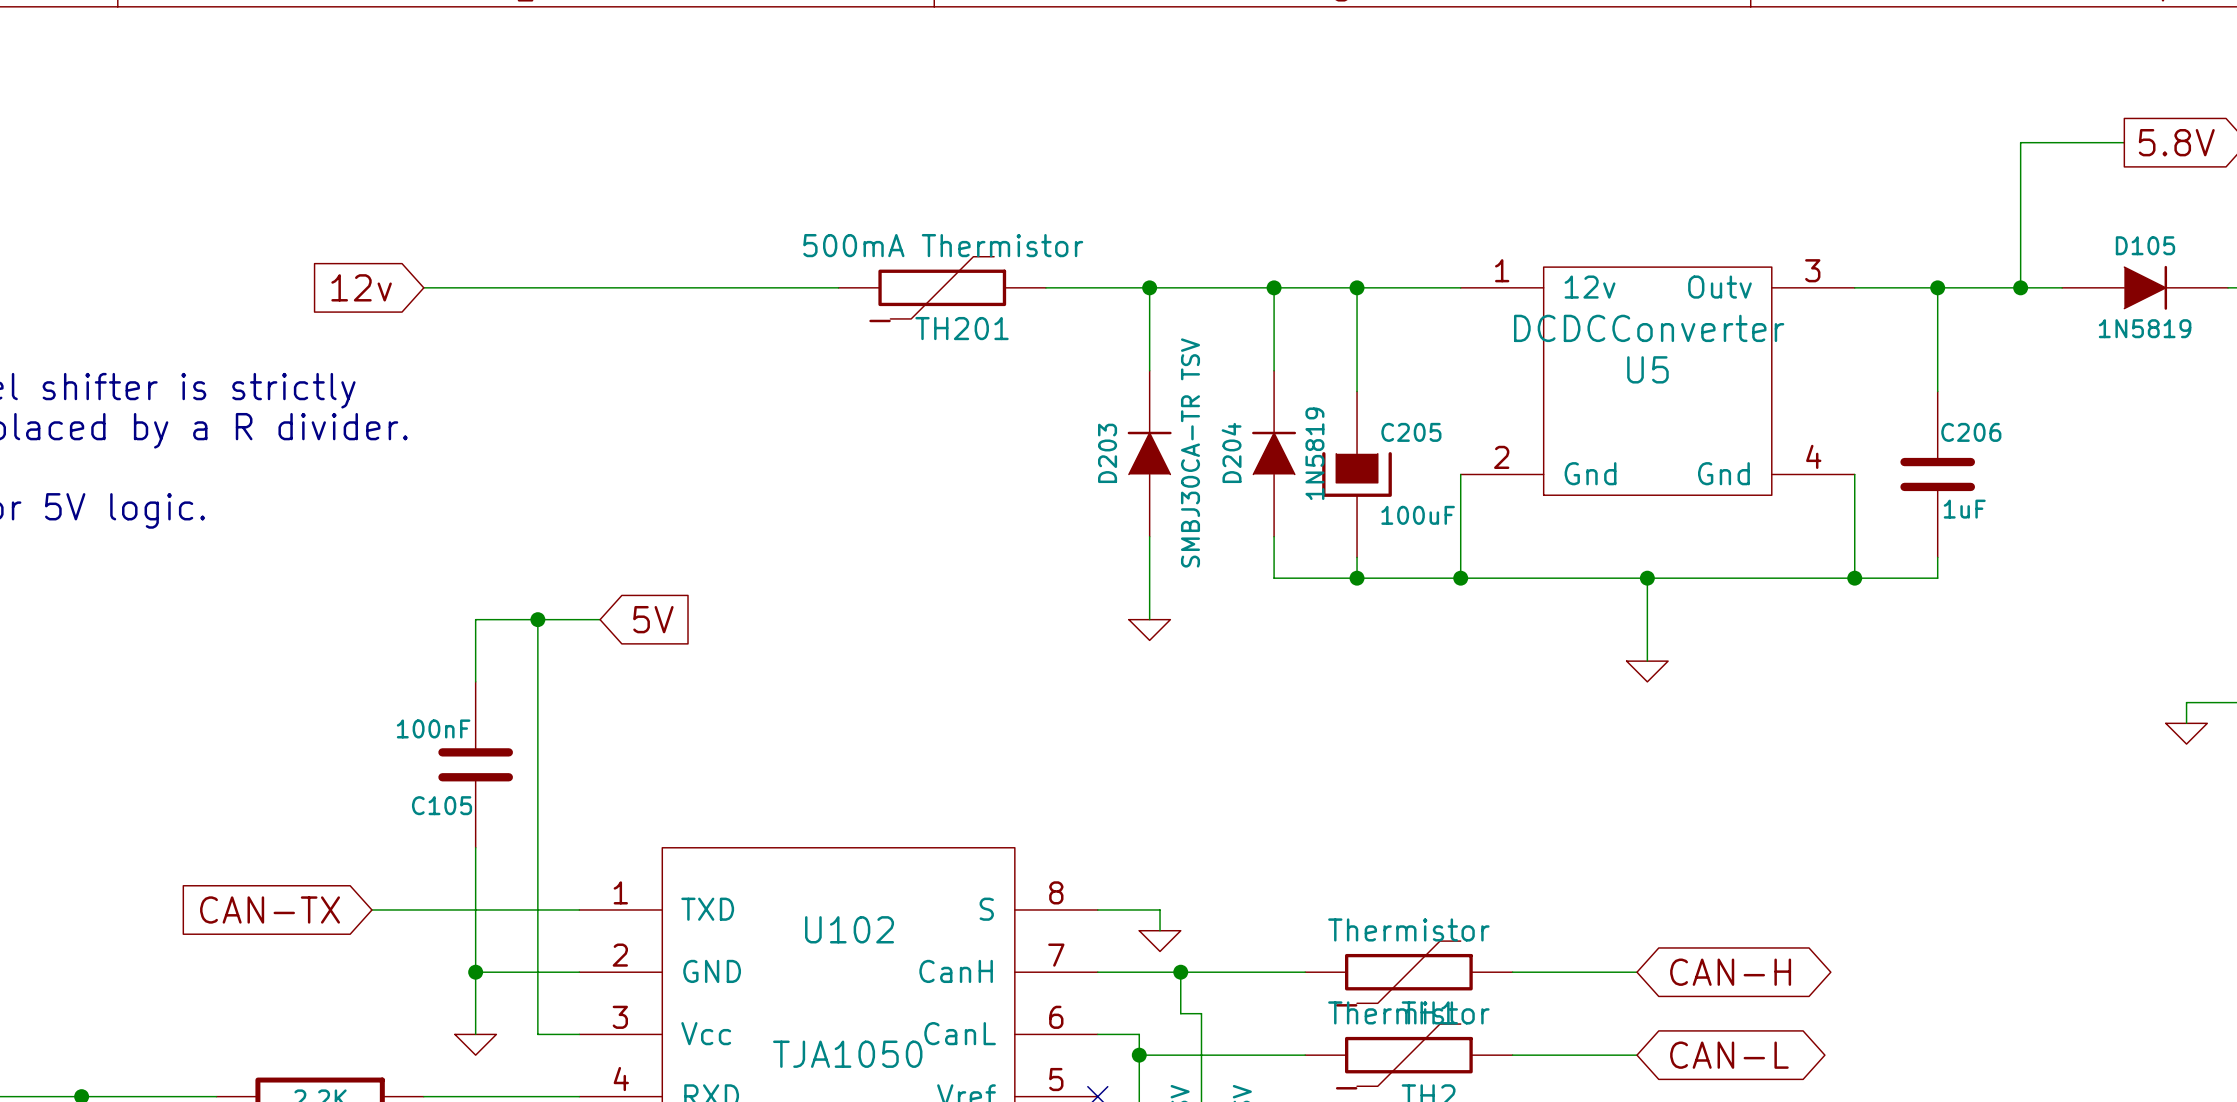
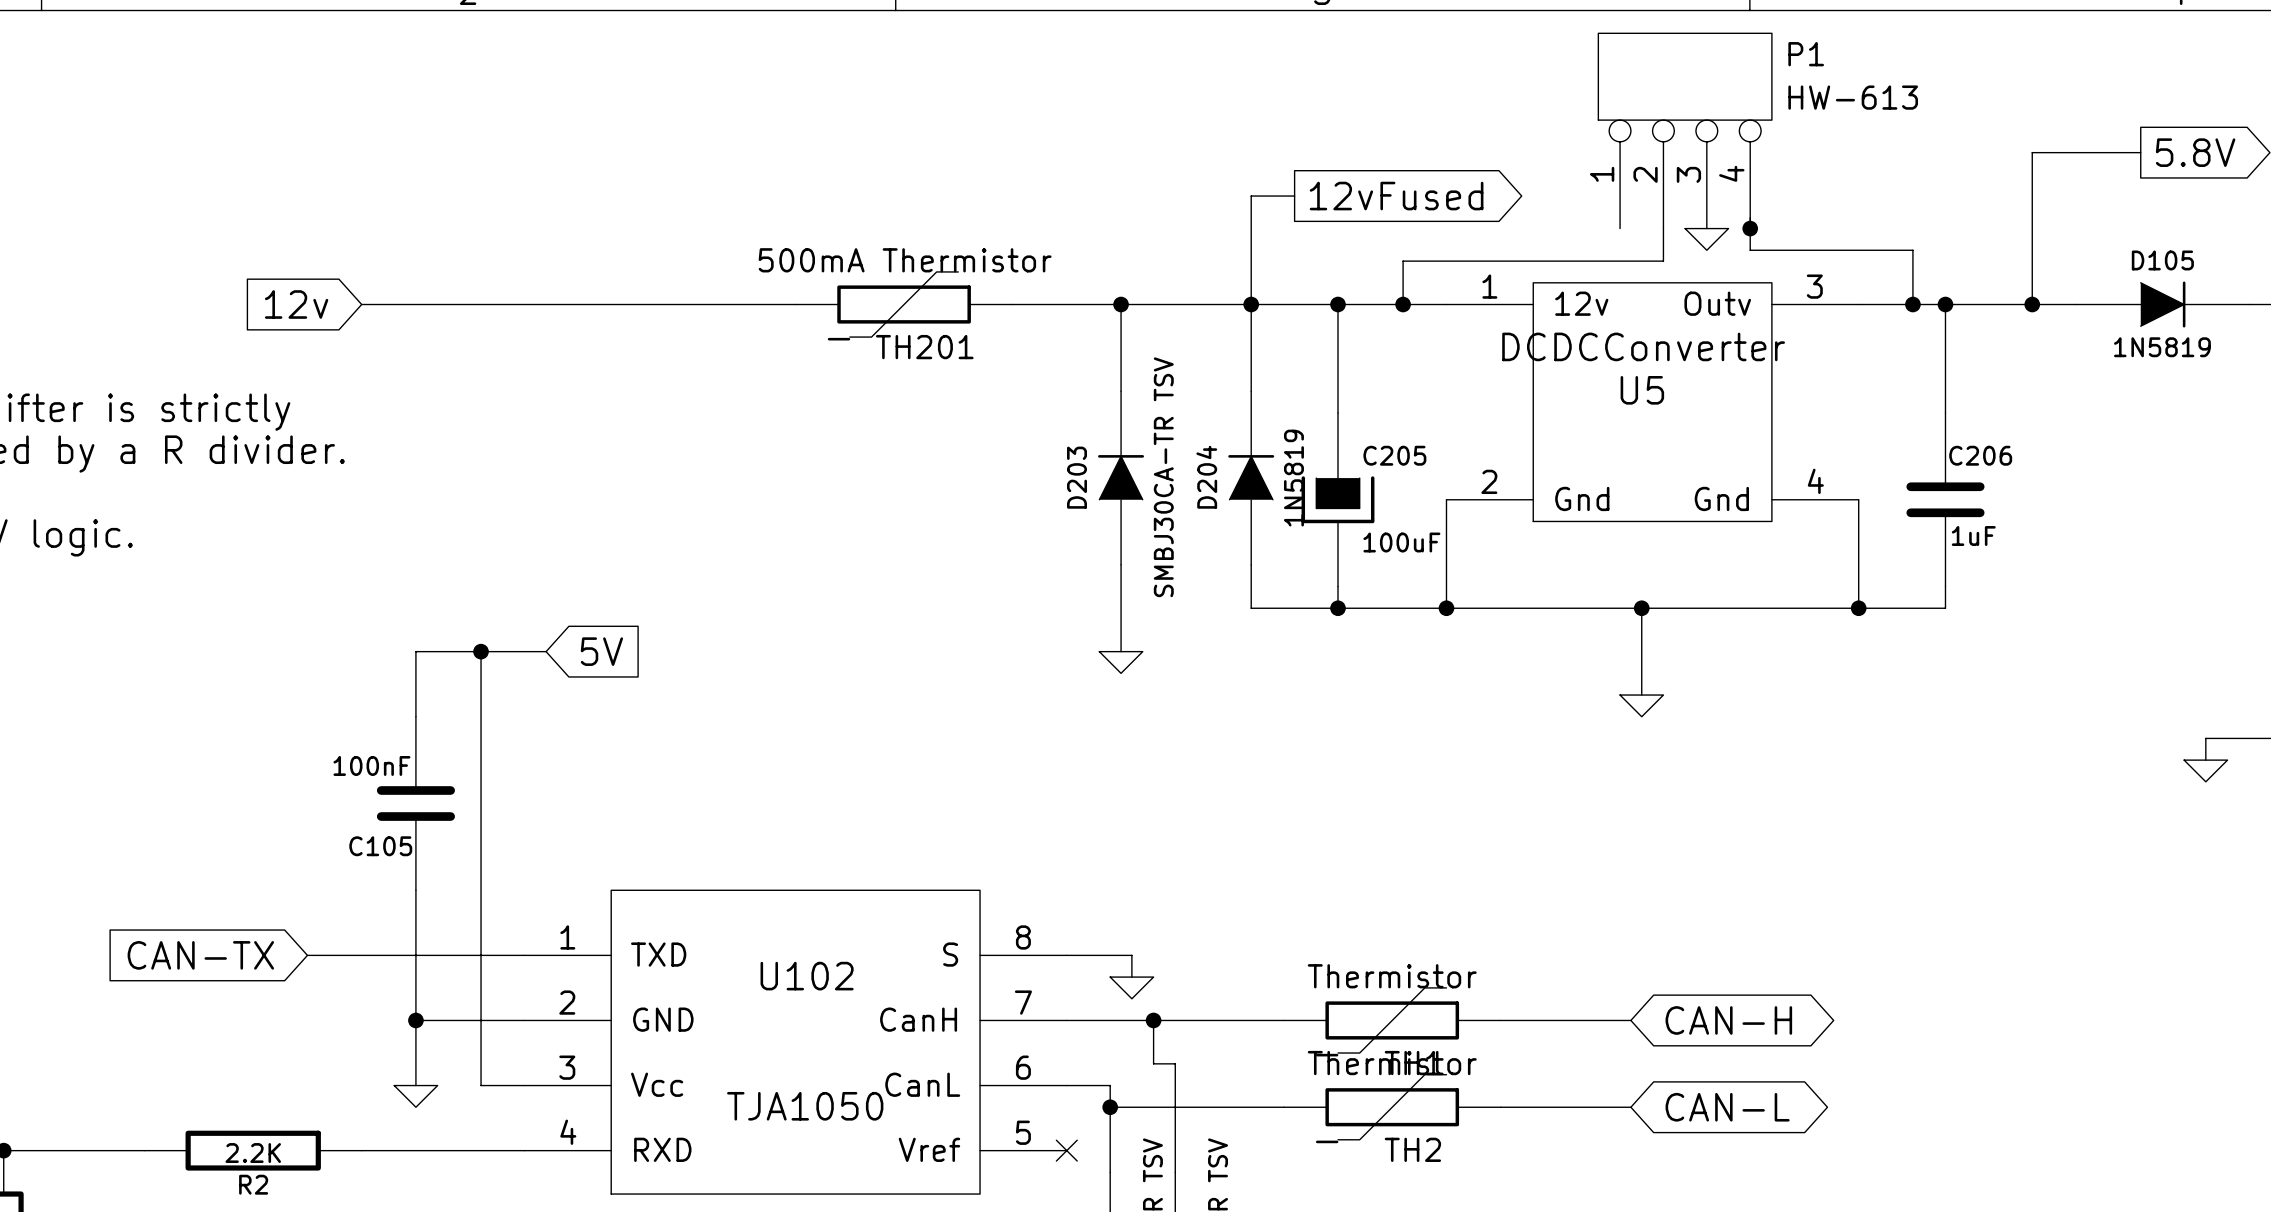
P1: none -> HW-613 (1685, 130)
wire: none -> (1294, 196) (1251, 196) (1251, 304)
global label: none -> 12vFused (1396, 196)
wire: none -> (1750, 217) (1750, 250) (1912, 250) (1912, 304)
wire: none -> (1663, 228) (1663, 261) (1403, 261) (1403, 304)
junction: none -> (1750, 228)
power symbol: none -> (1706, 239)
junction: none -> (1403, 304)
junction: none -> (1912, 304)

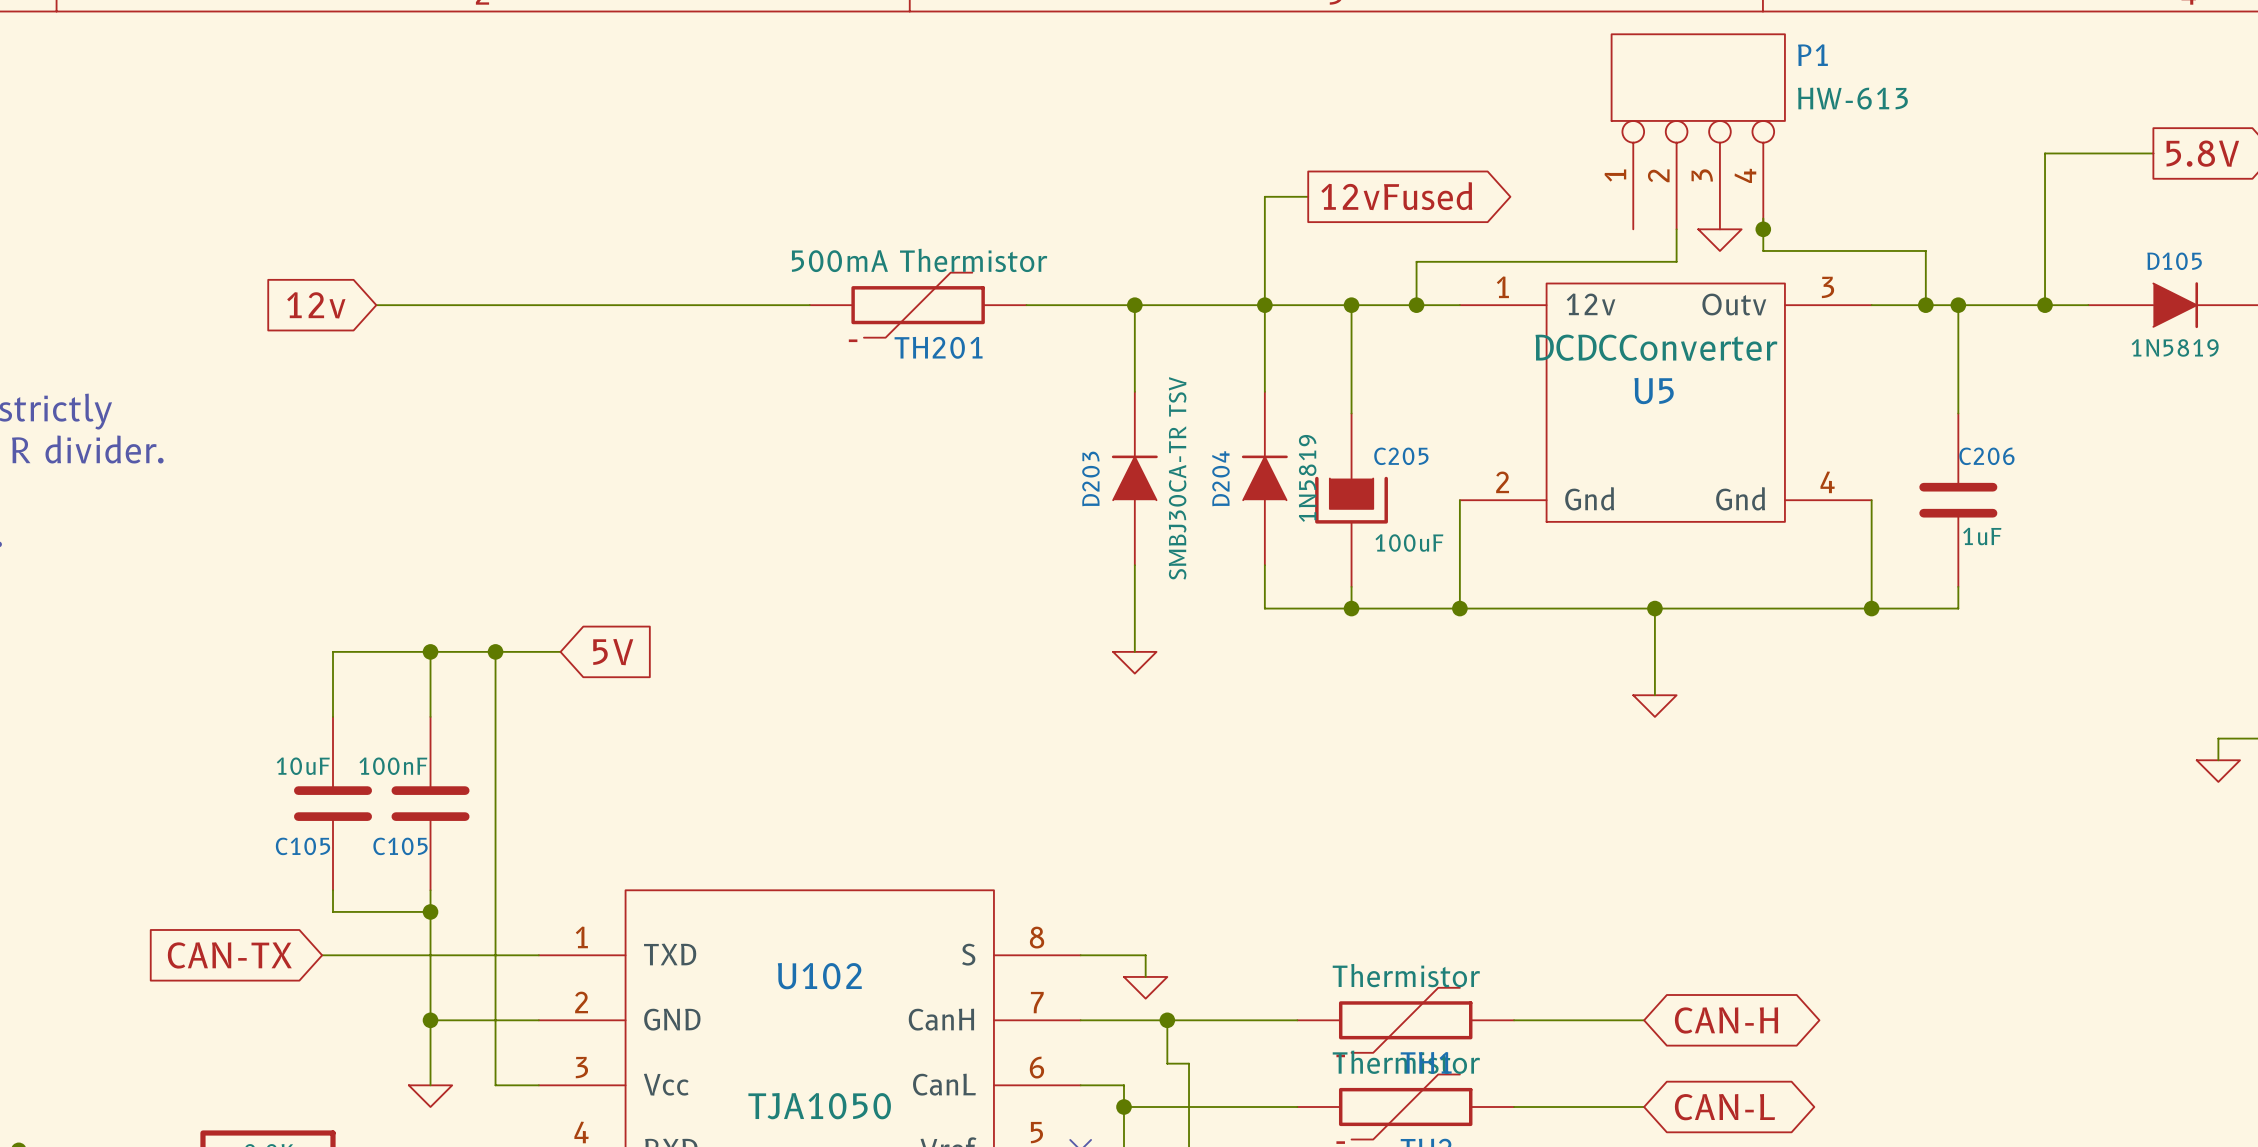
wire: none -> (430, 651) (333, 651) (333, 716)
junction: none -> (430, 651)
C105: none -> 10uF (333, 803)
wire: none -> (333, 890) (333, 911) (430, 911)
junction: none -> (430, 911)

